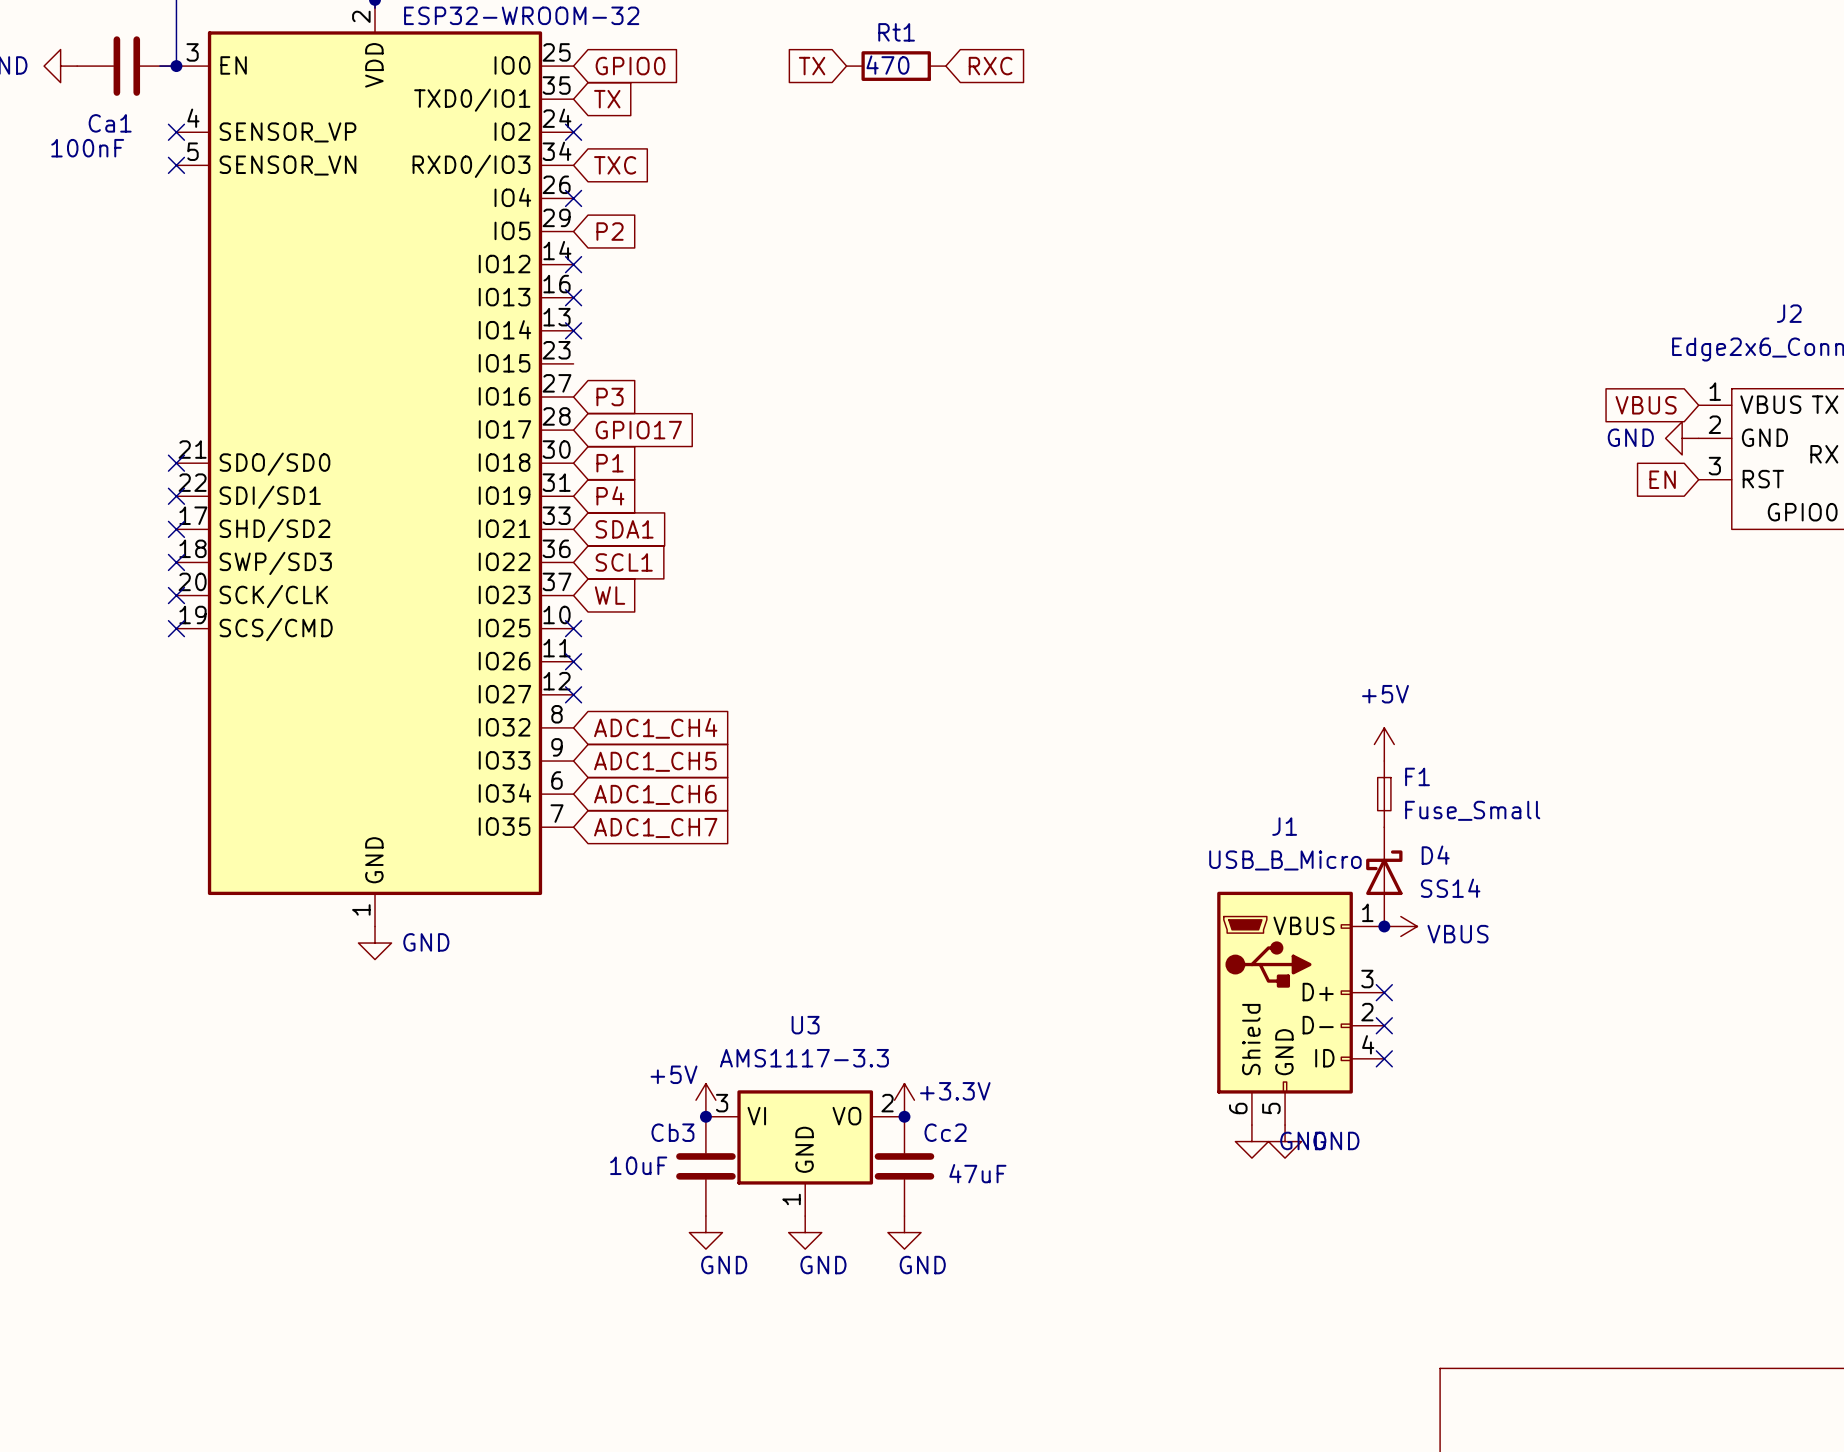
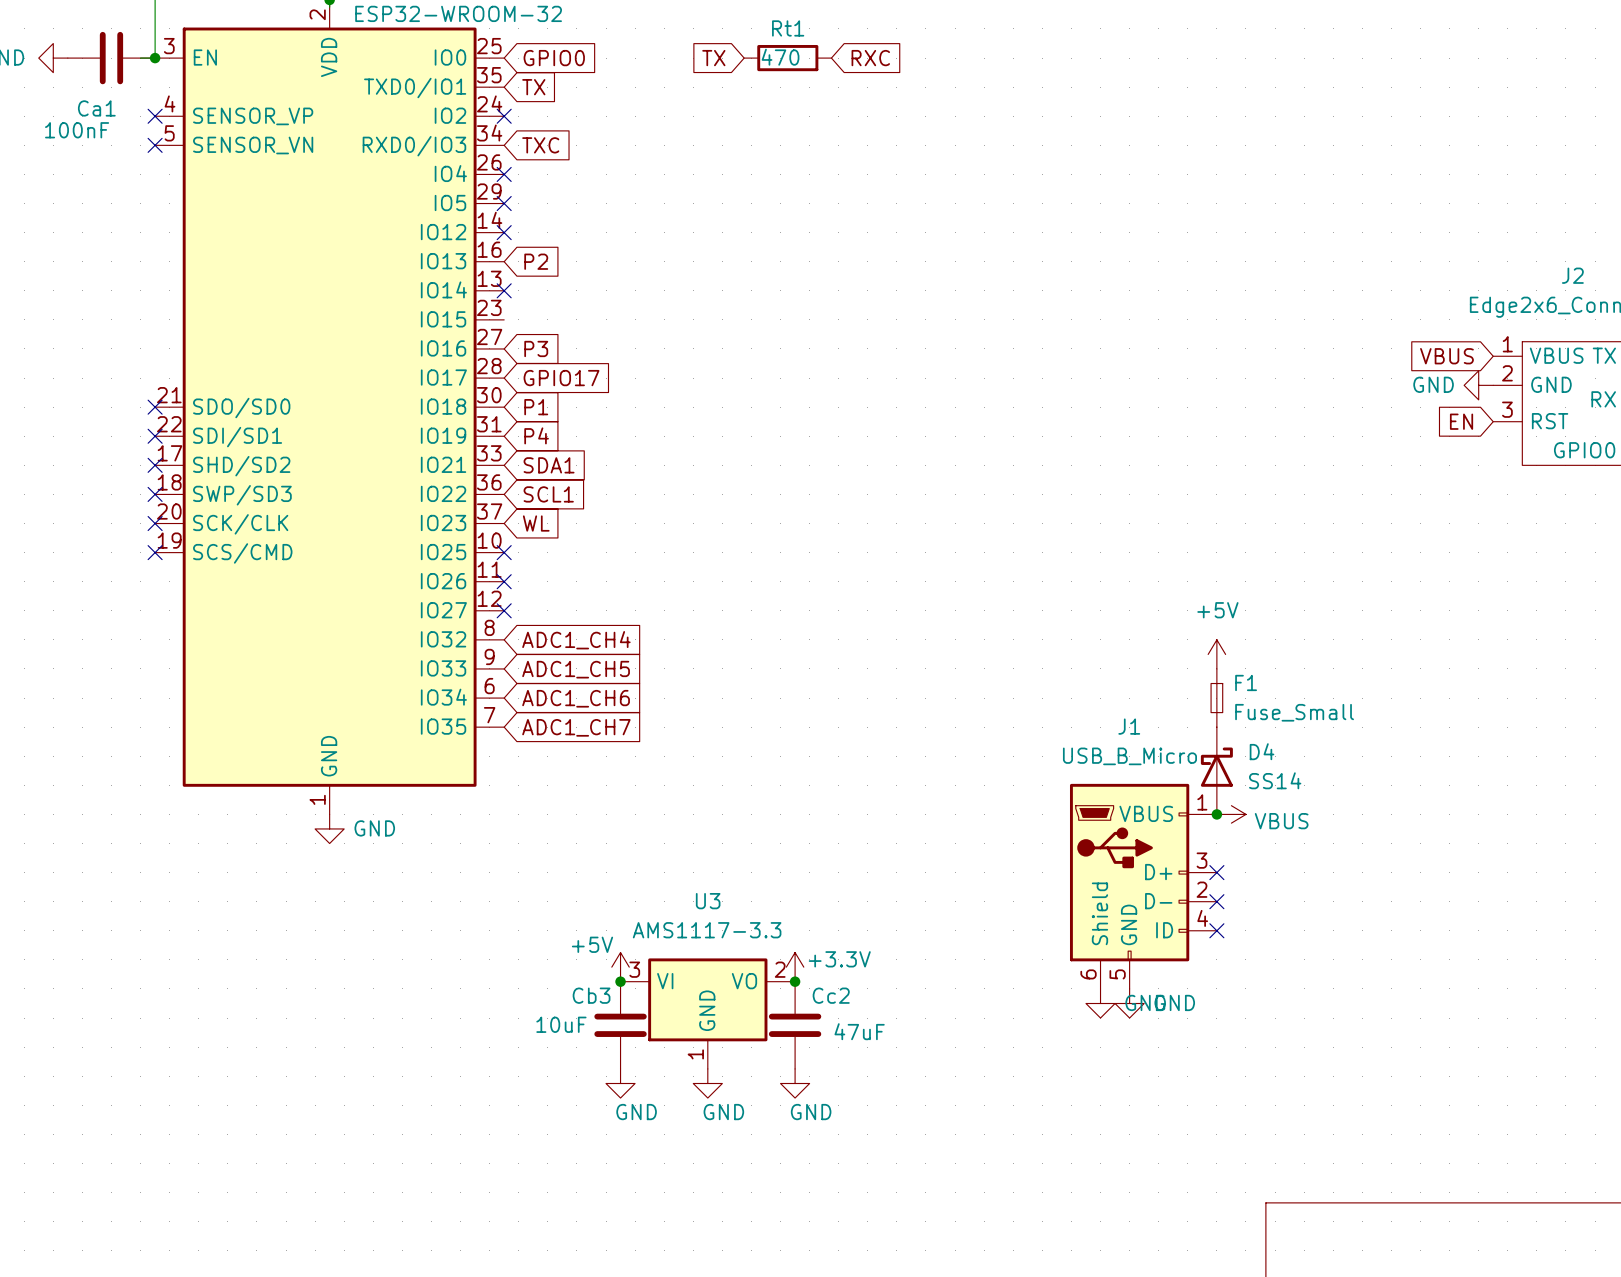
global label position: P2 (610, 231) -> P2 (536, 261)
no-connect mark position: (573, 297) -> (504, 203)

